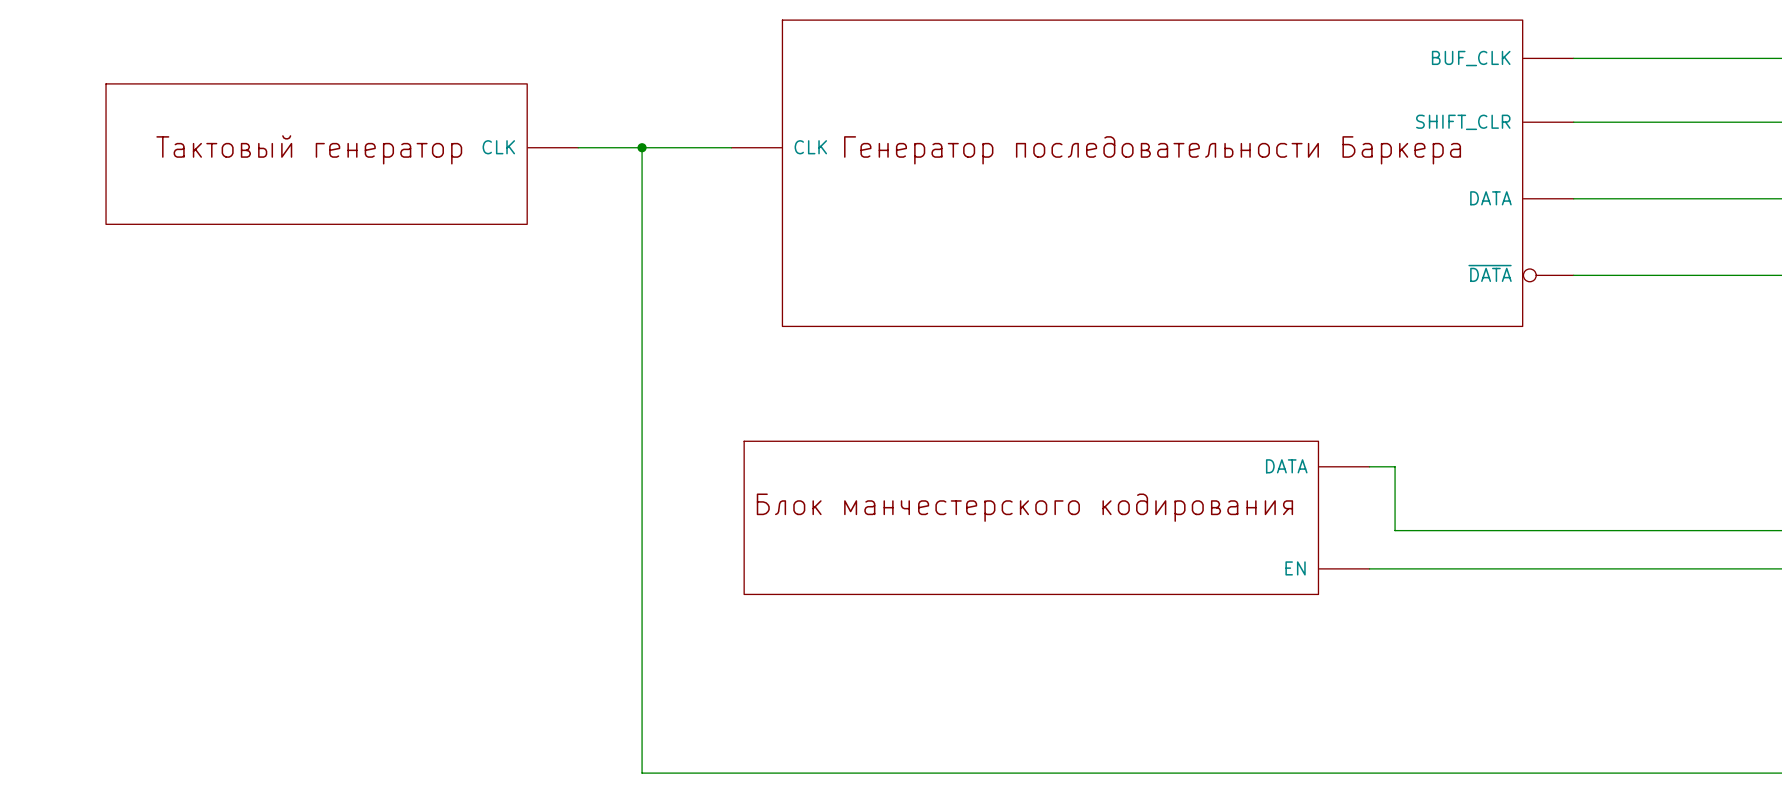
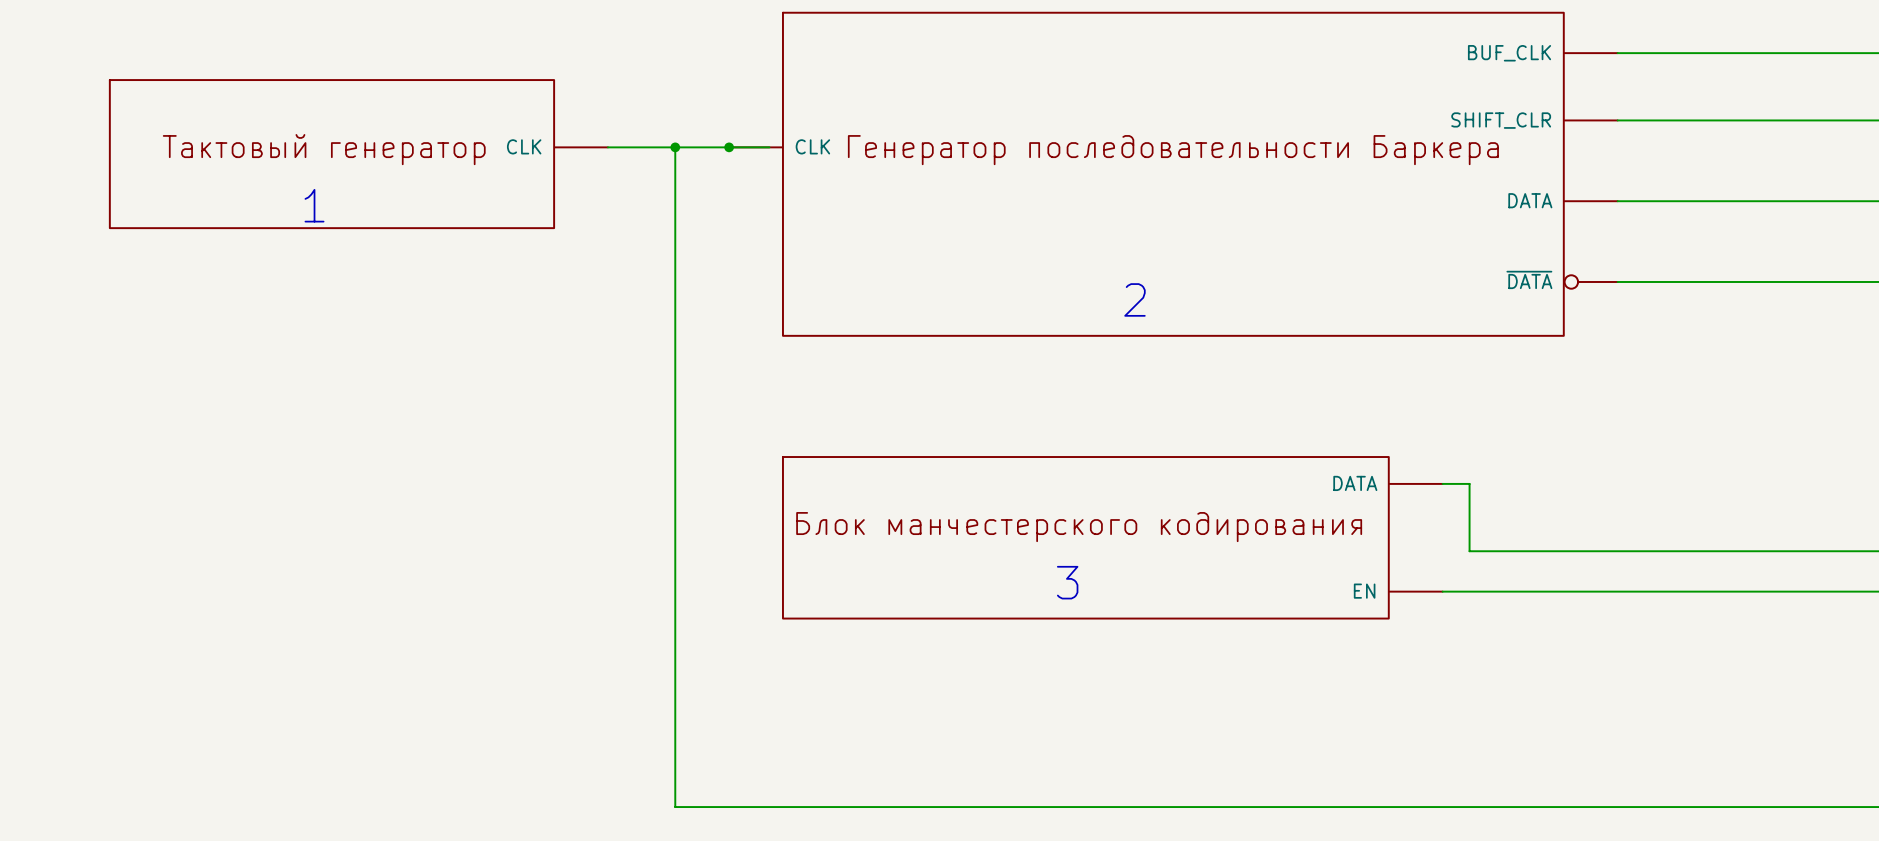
junction: none -> (729, 147)
part position: (1152, 173) -> (1173, 174)
text: none -> 1 (314, 205)
text: none -> 2 (1134, 299)
text: none -> 3 (1067, 582)

